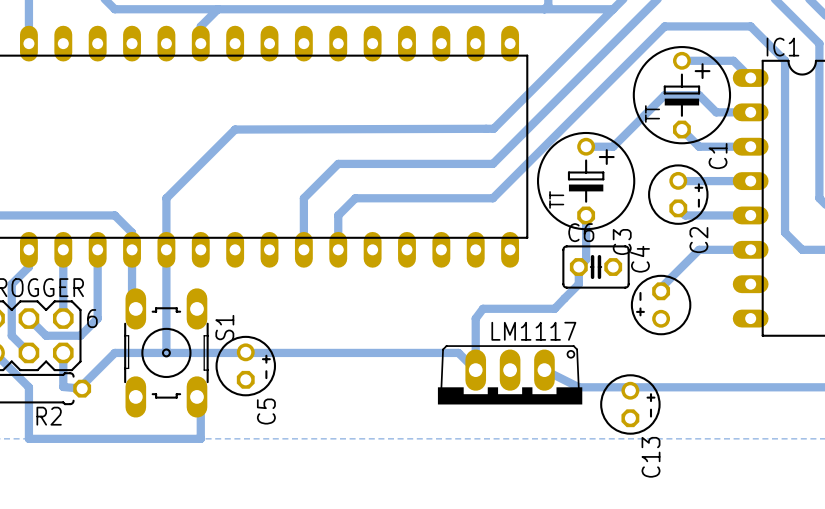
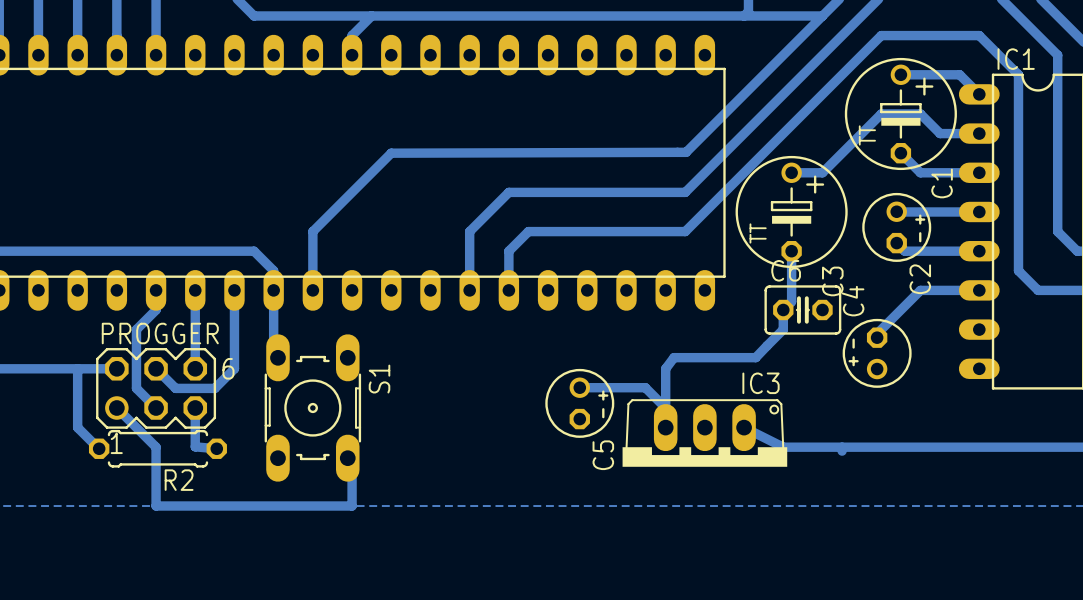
bottom track: (166, 249) (166, 352) -> none
LM1117 name: LM1117 (533, 331) -> IC3 (761, 383)
bottom track: none -> (579, 387) (645, 387) (665, 408)
C5 position: (245, 366) -> (579, 403)
bottom track: (475, 370) (458, 352) (114, 352) (82, 385) (82, 388) -> none
C13: (630, 404) -> none

